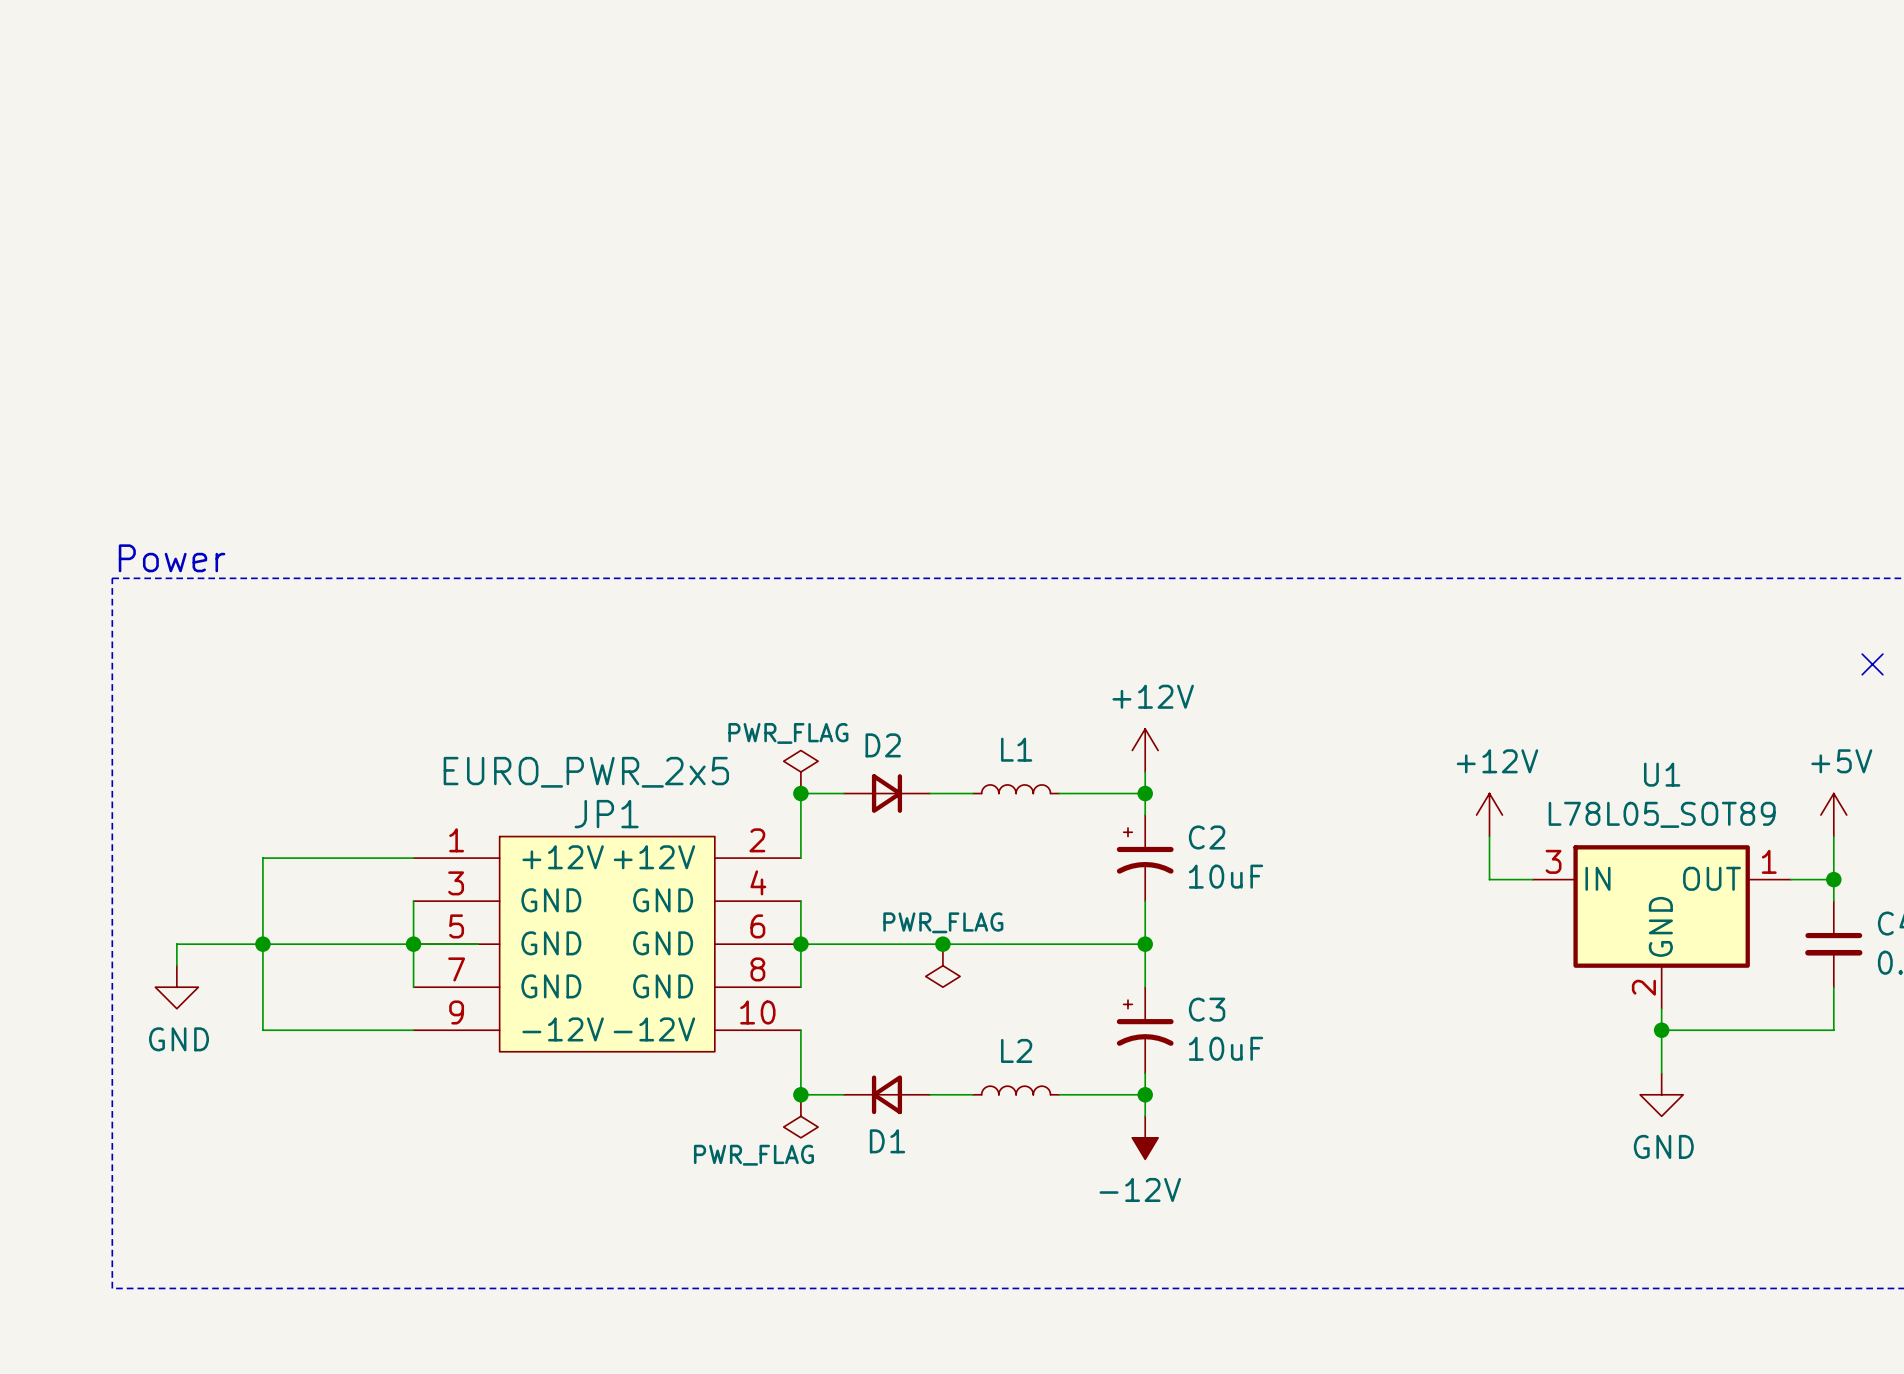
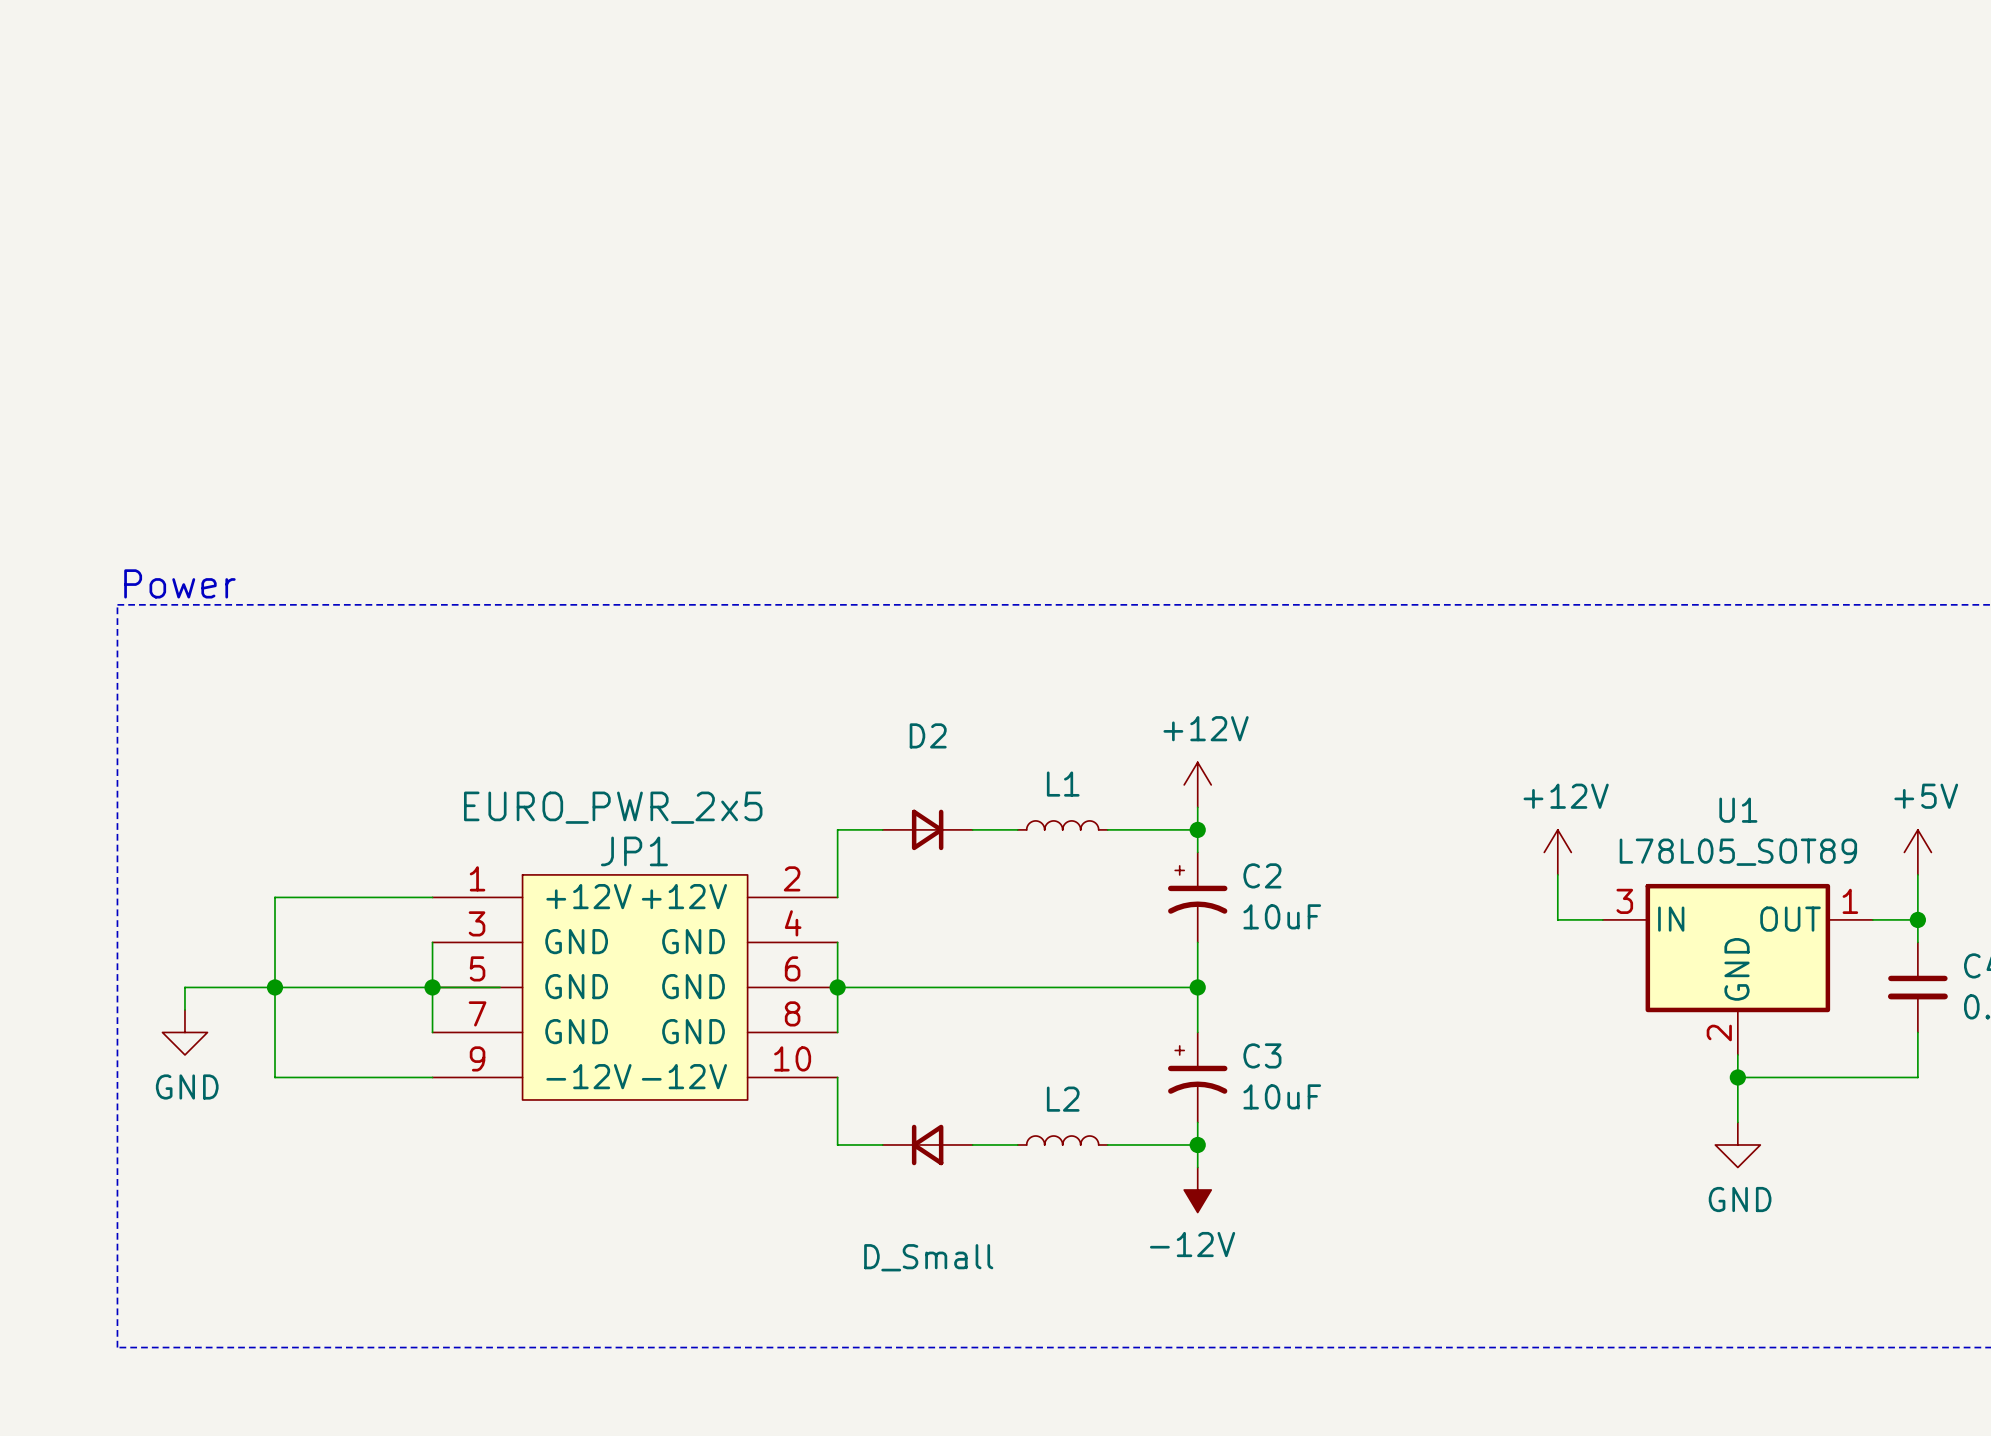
no-connect mark: (1872, 664) -> none
D2 name position: D2 (883, 745) -> D2 (928, 735)
power symbol: PWR_FLAG (800, 772) -> none
junction: (800, 793) -> none
junction: (942, 944) -> none
power symbol: PWR_FLAG (942, 965) -> none
junction: (800, 1094) -> none
power symbol: PWR_FLAG (800, 1116) -> none
D1 name: D1 (887, 1141) -> none
D1 value: none -> D_Small (928, 1257)

